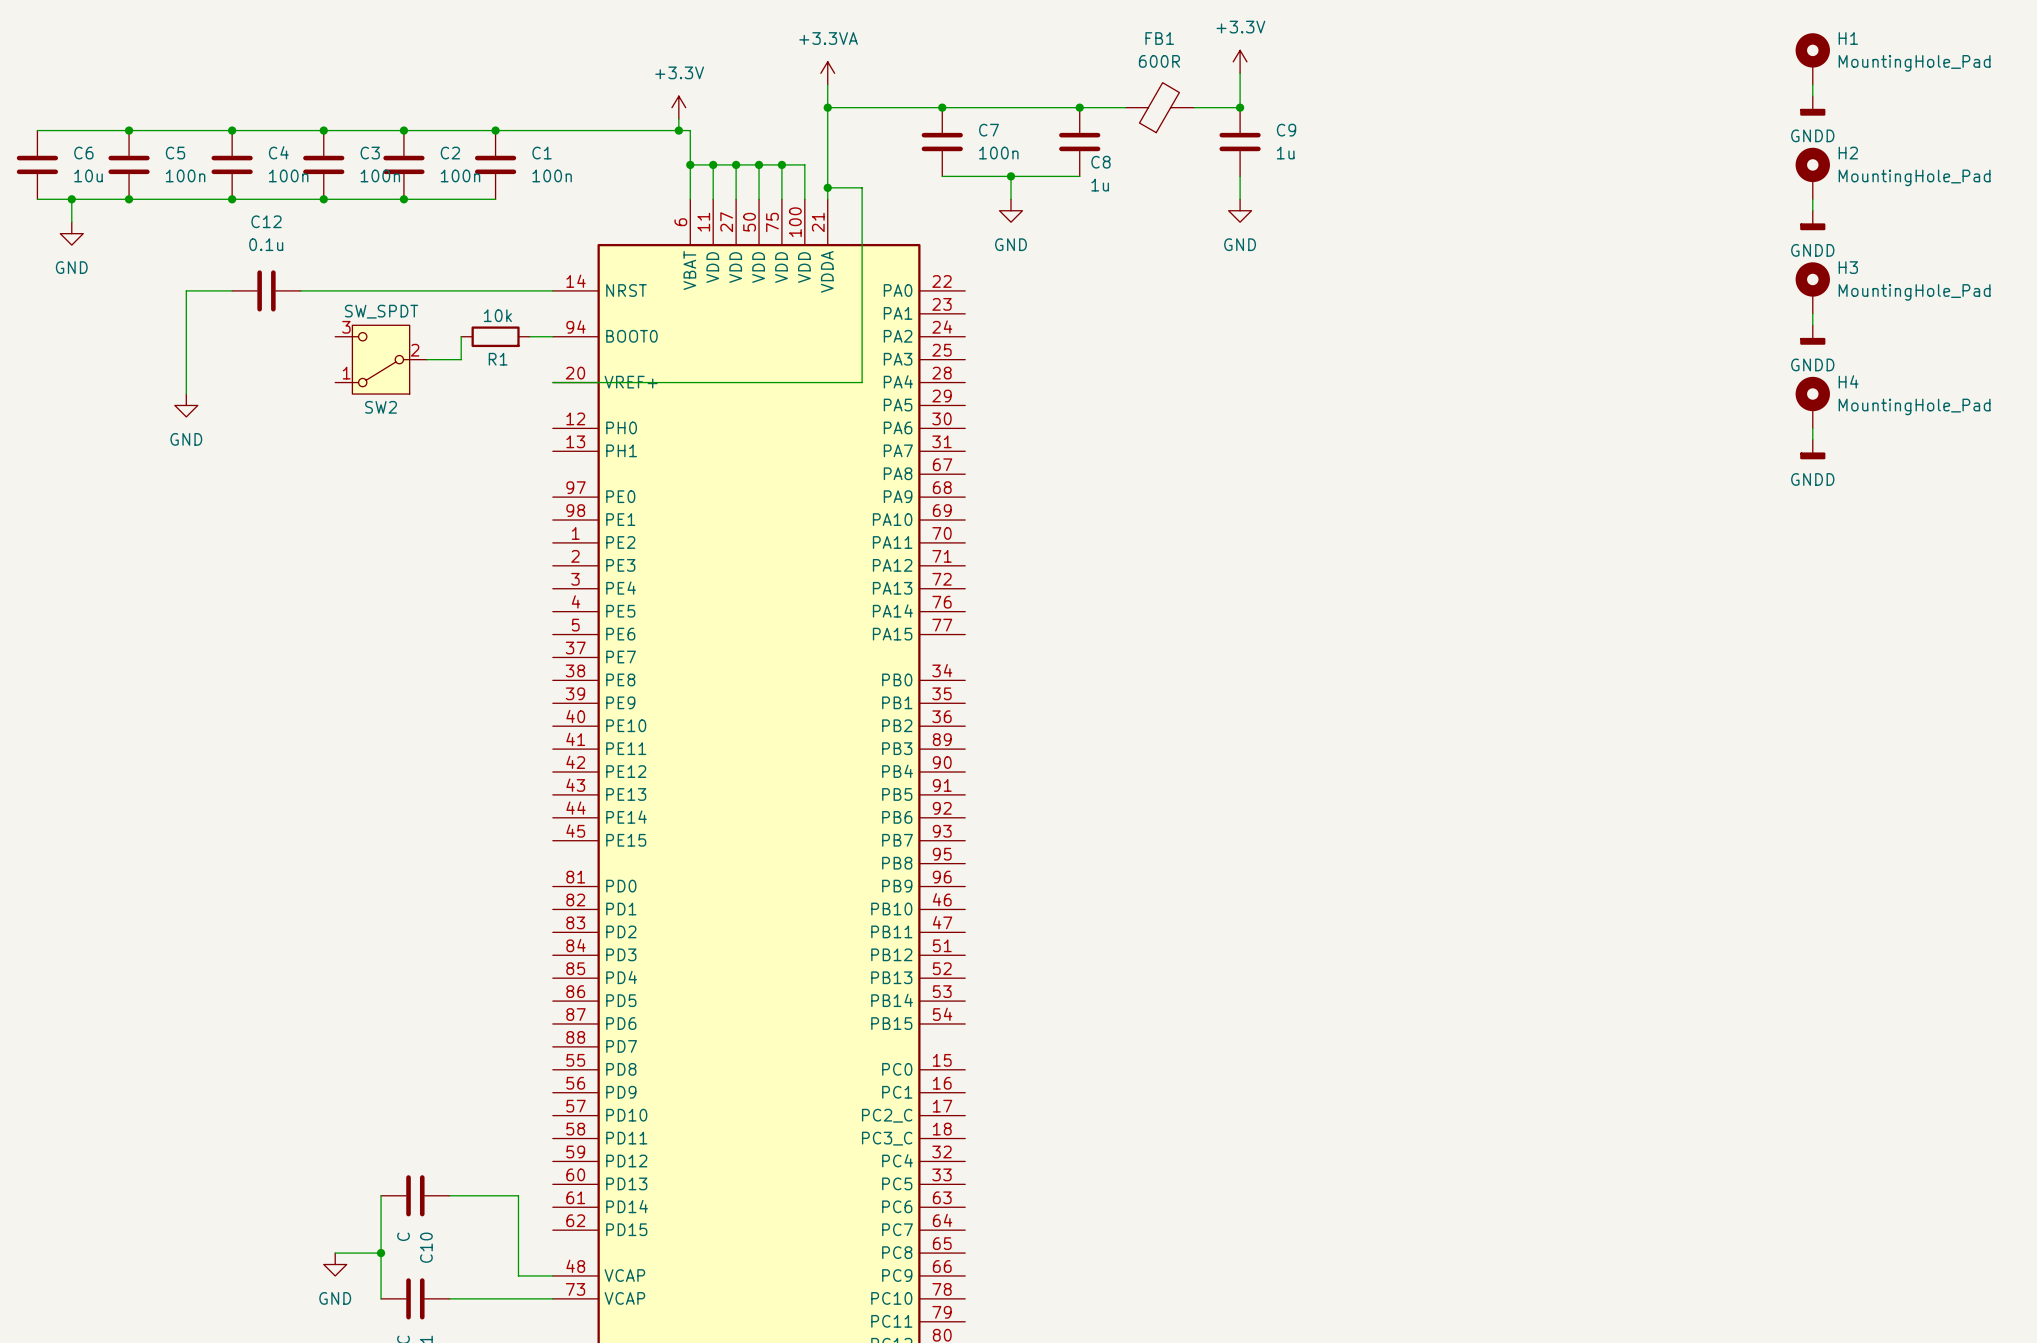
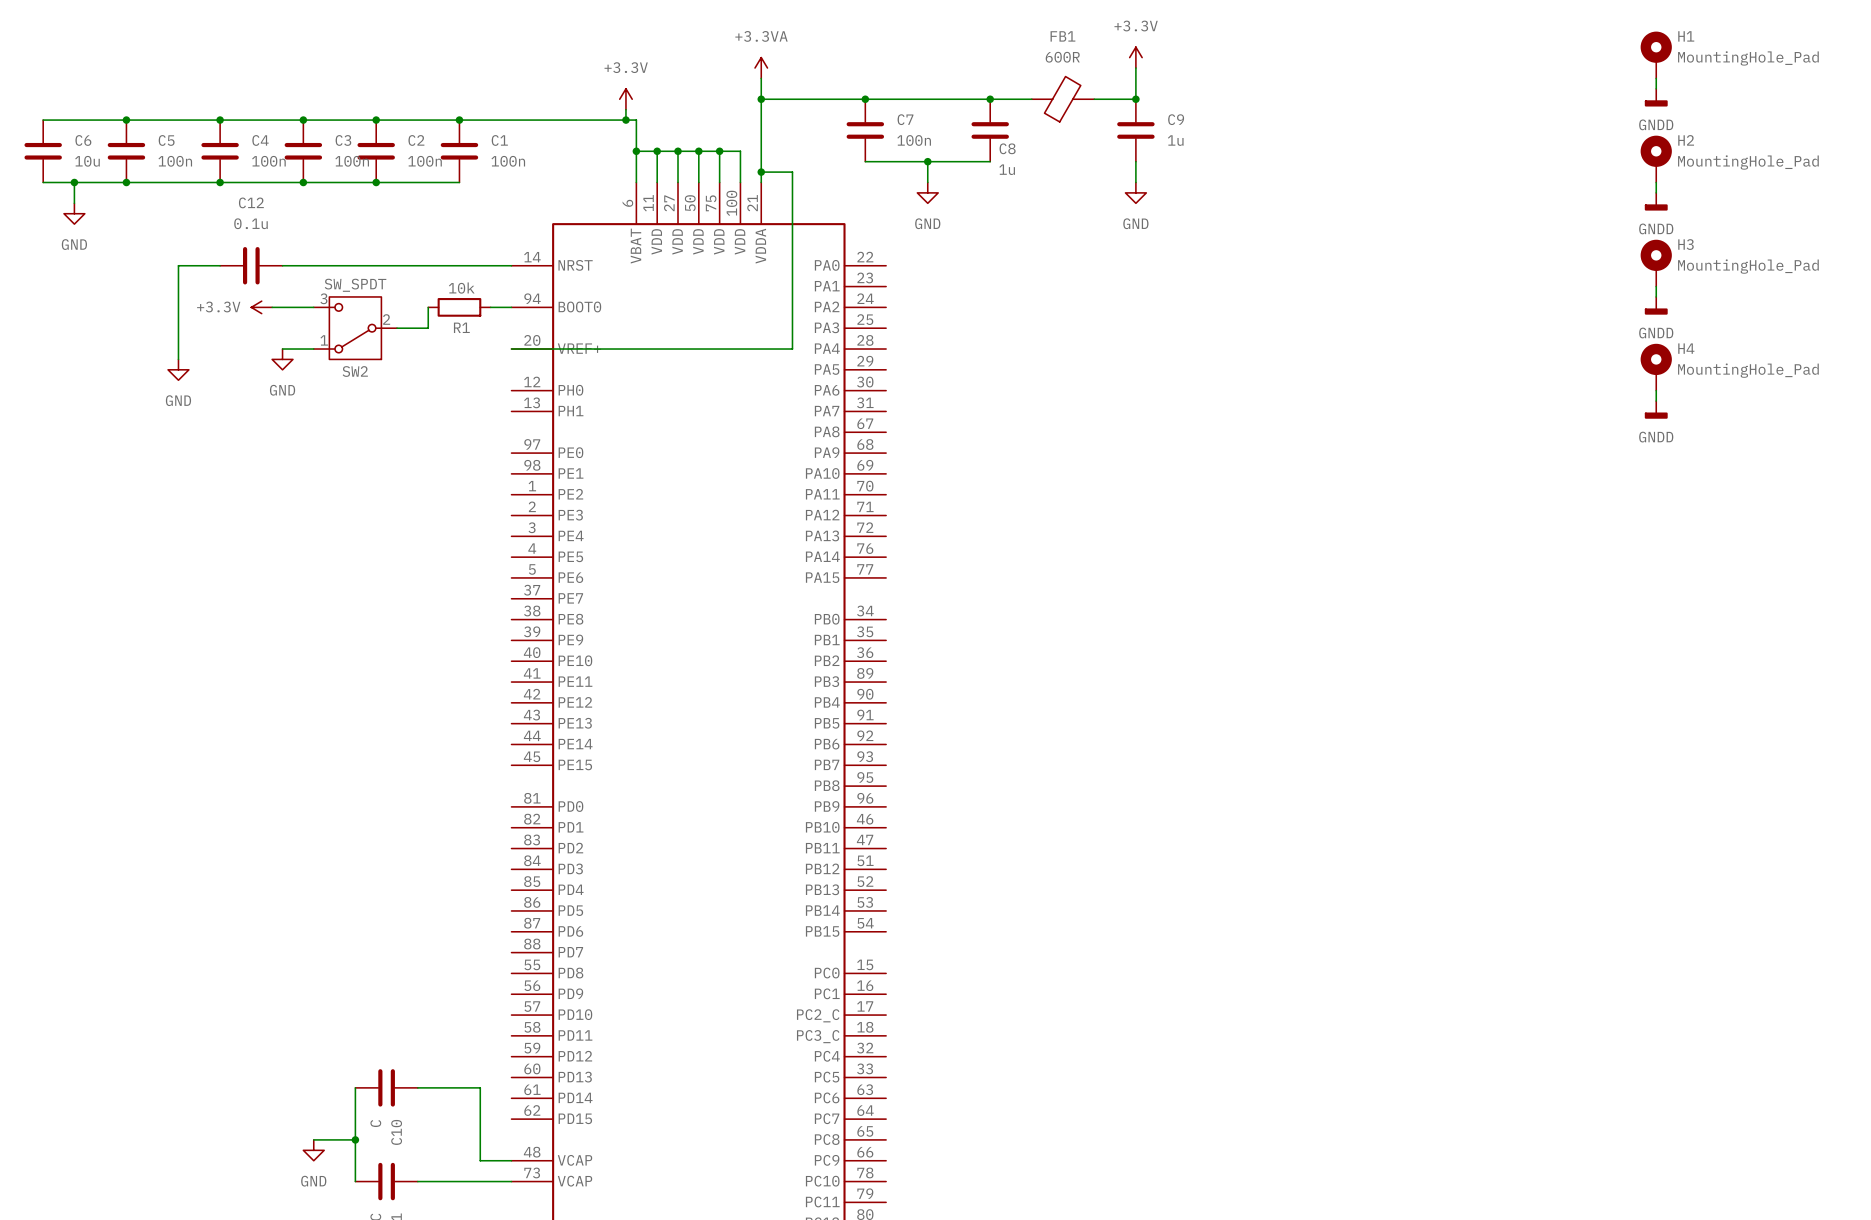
power symbol: none -> +3.3V (261, 307)
wire: none -> (272, 307) (313, 307)
wire: none -> (282, 349) (313, 349)
power symbol: none -> GND (282, 359)

